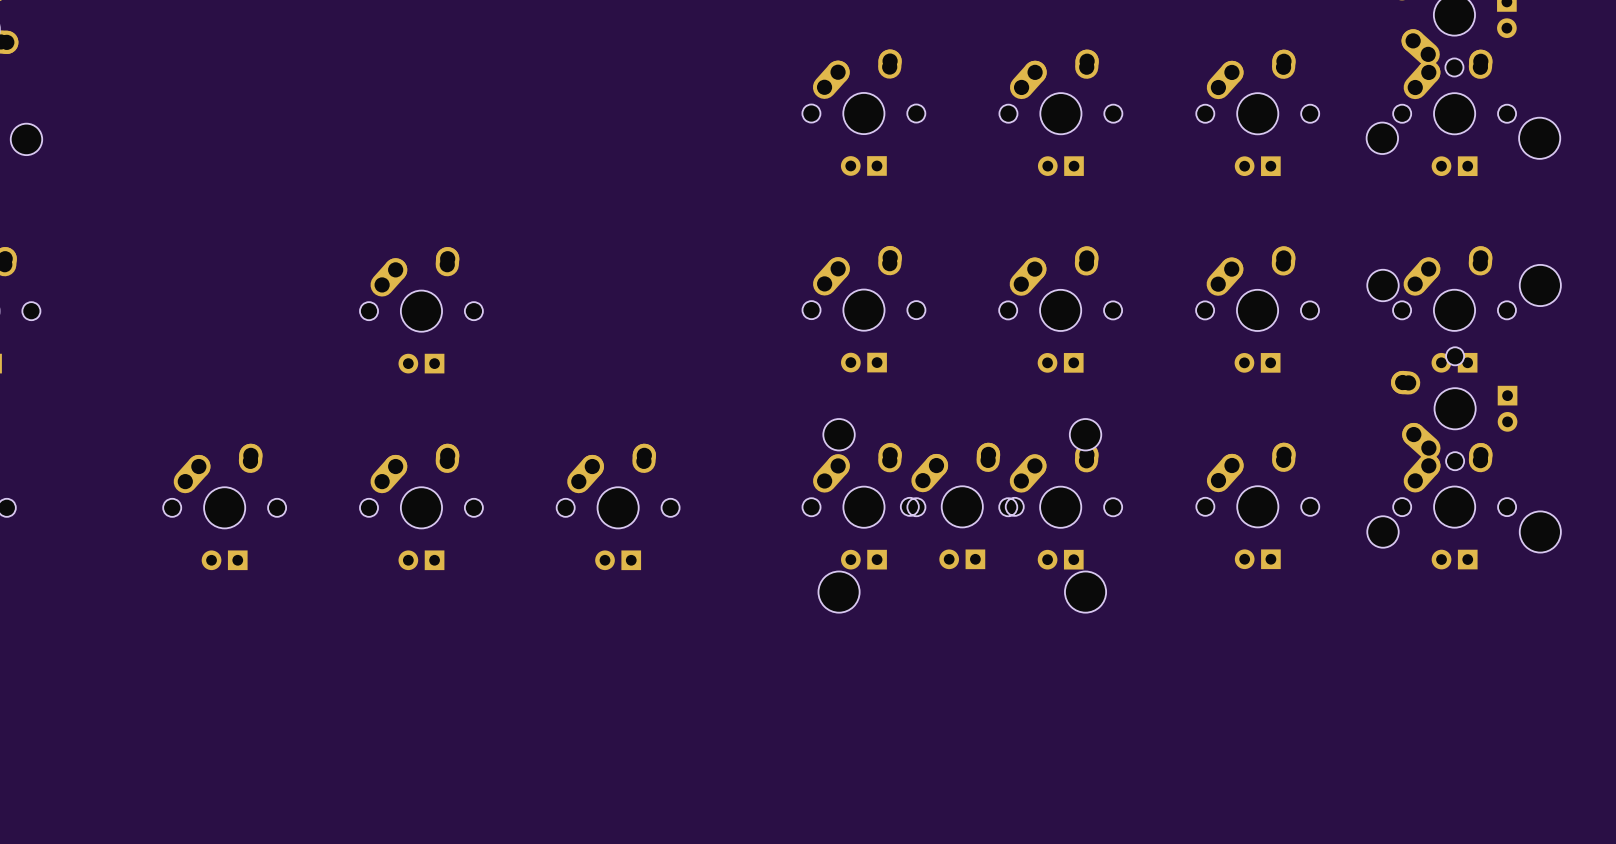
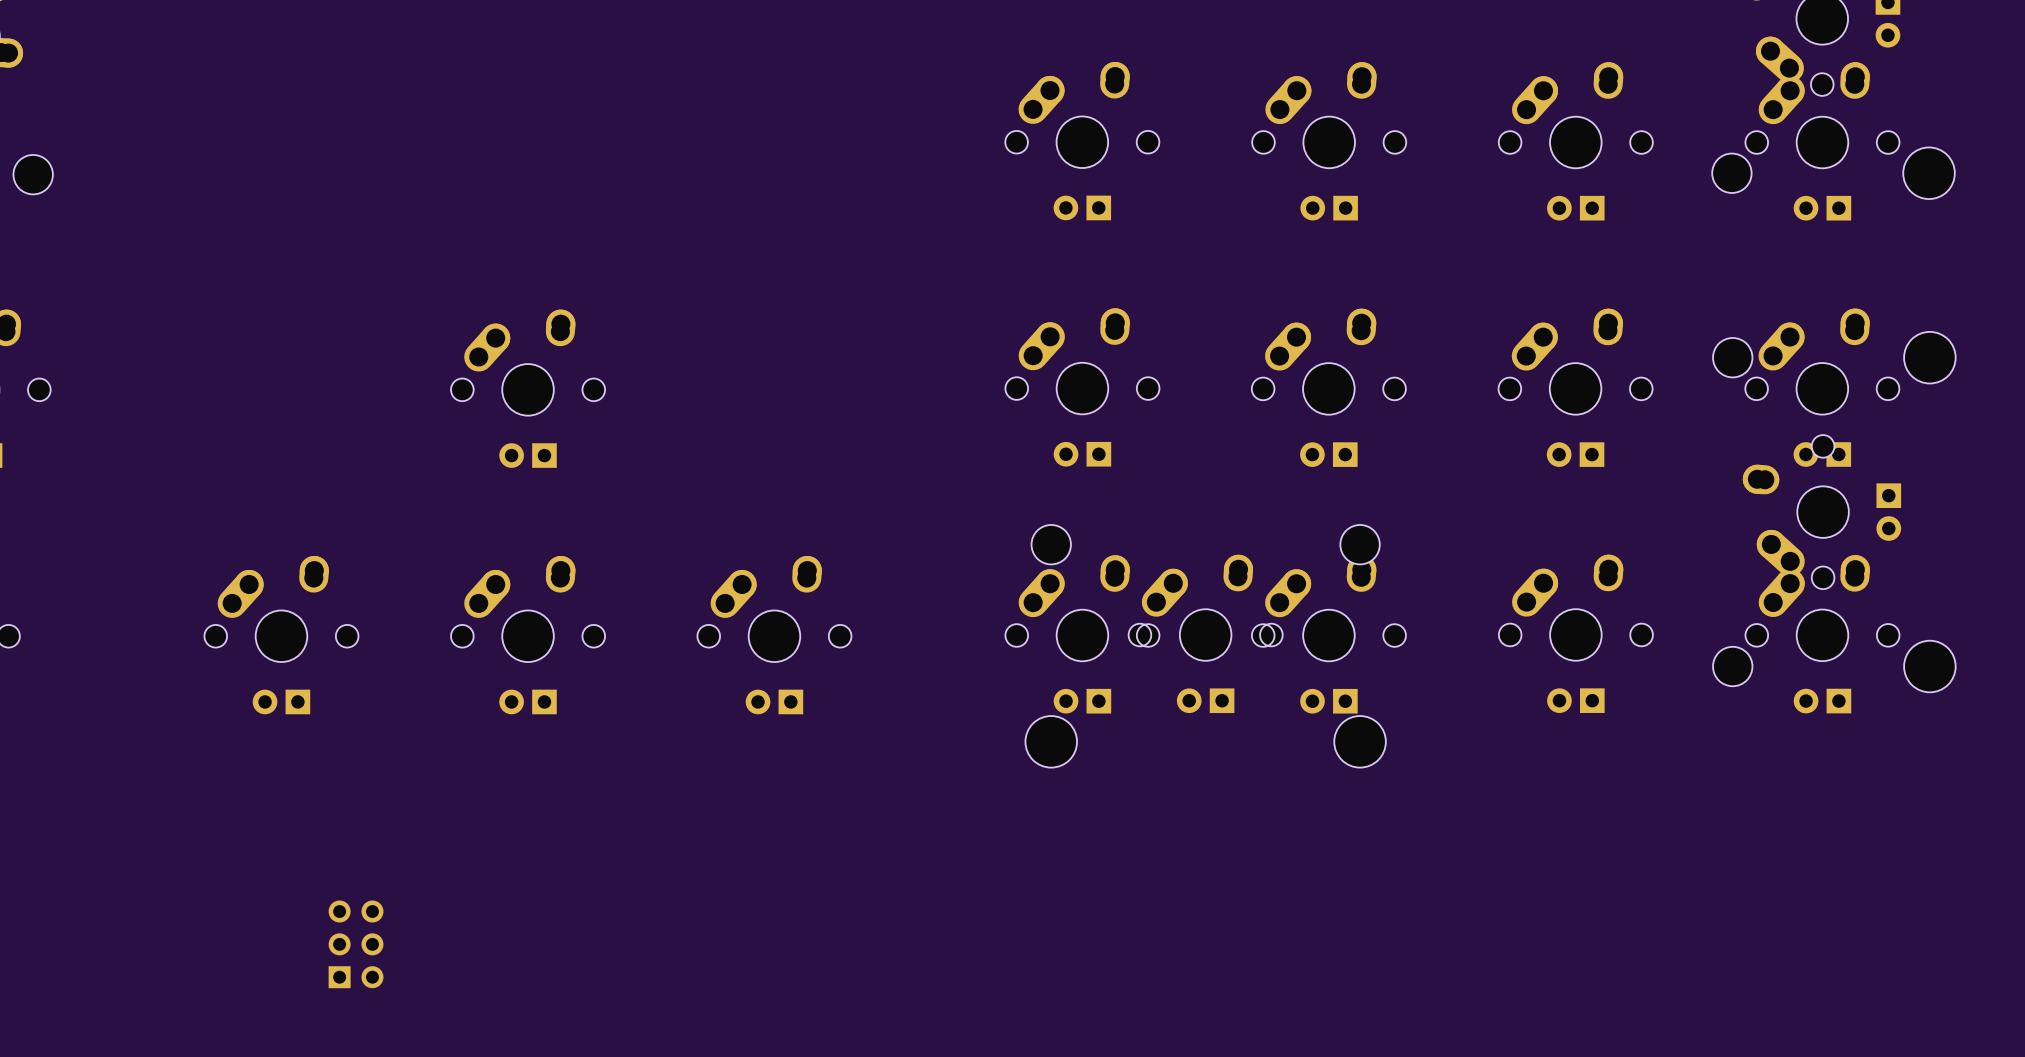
part: none -> (356, 944)

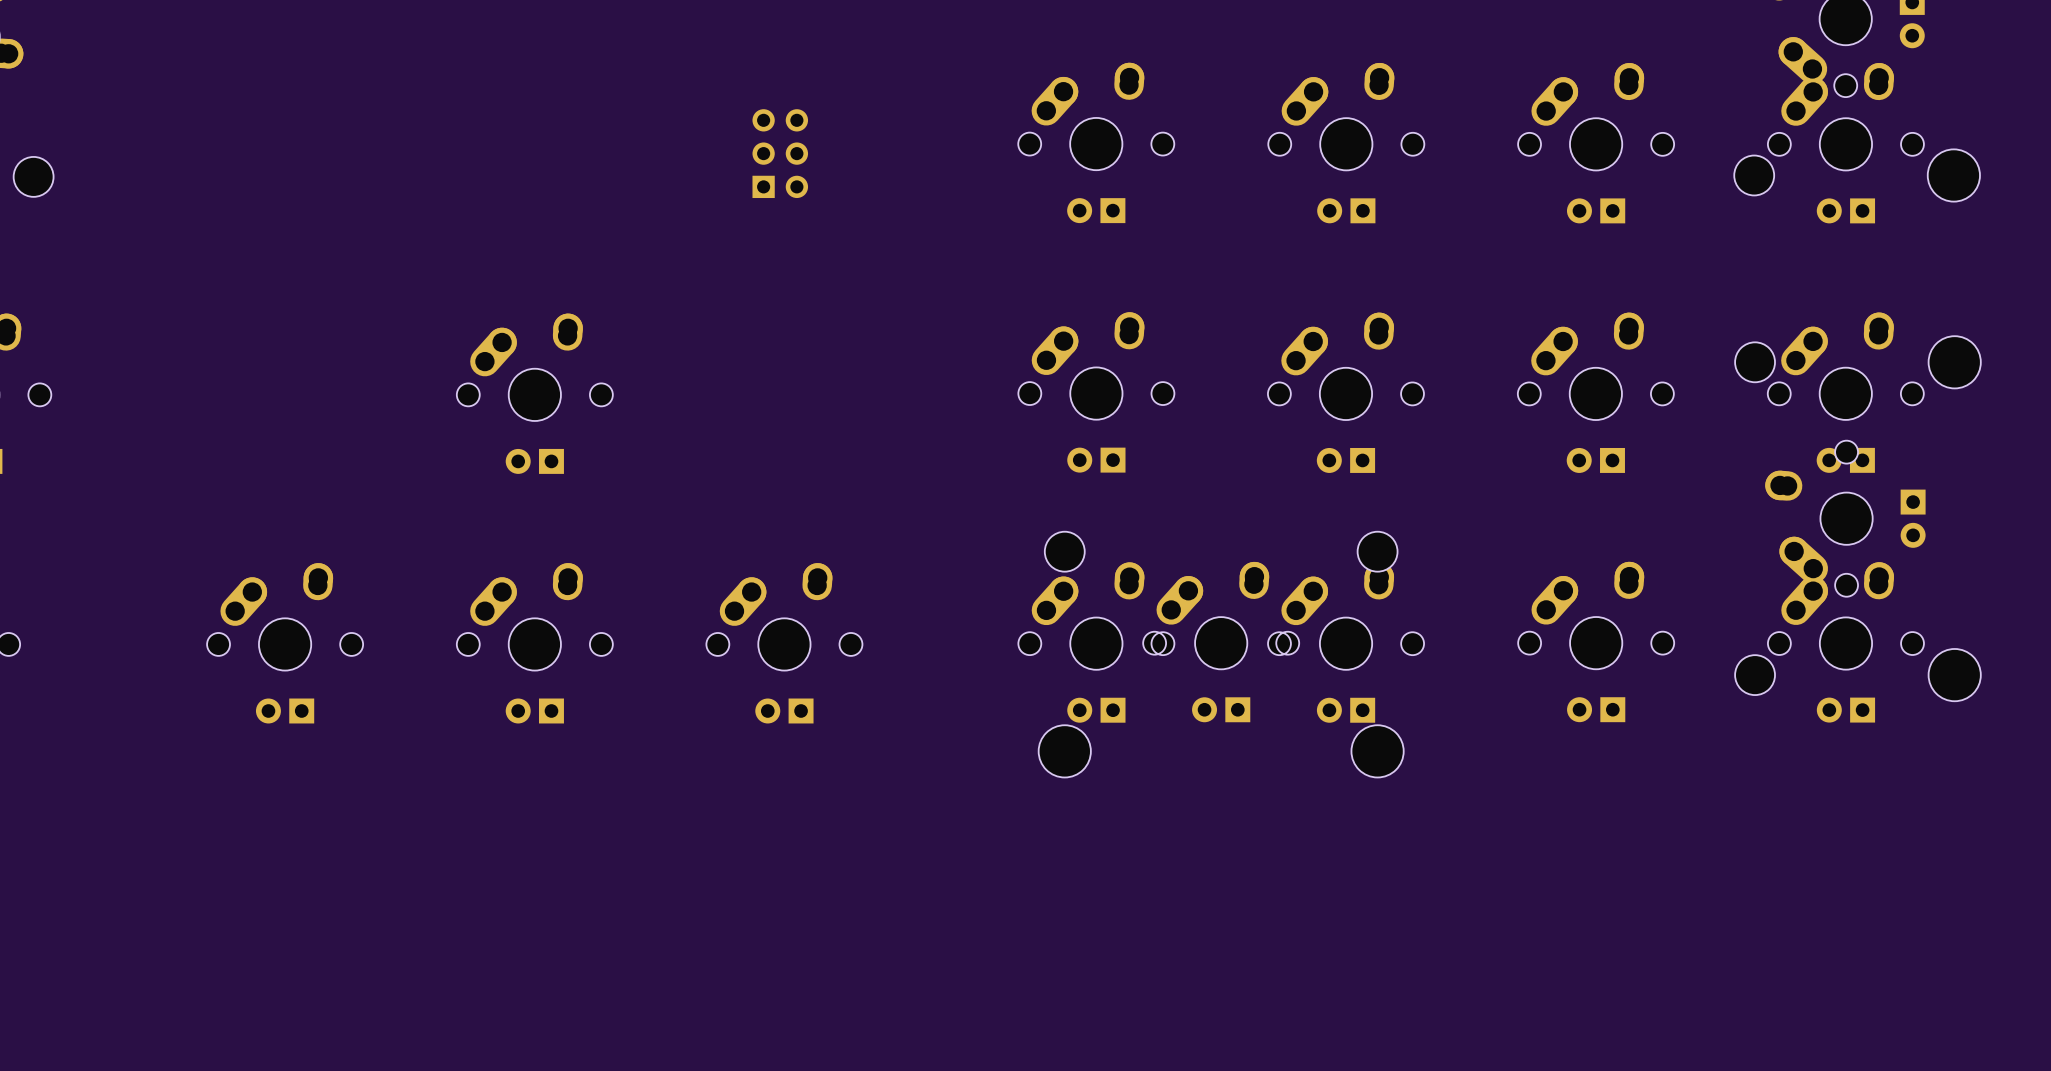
part: none -> (780, 153)
part: (356, 944) -> none

